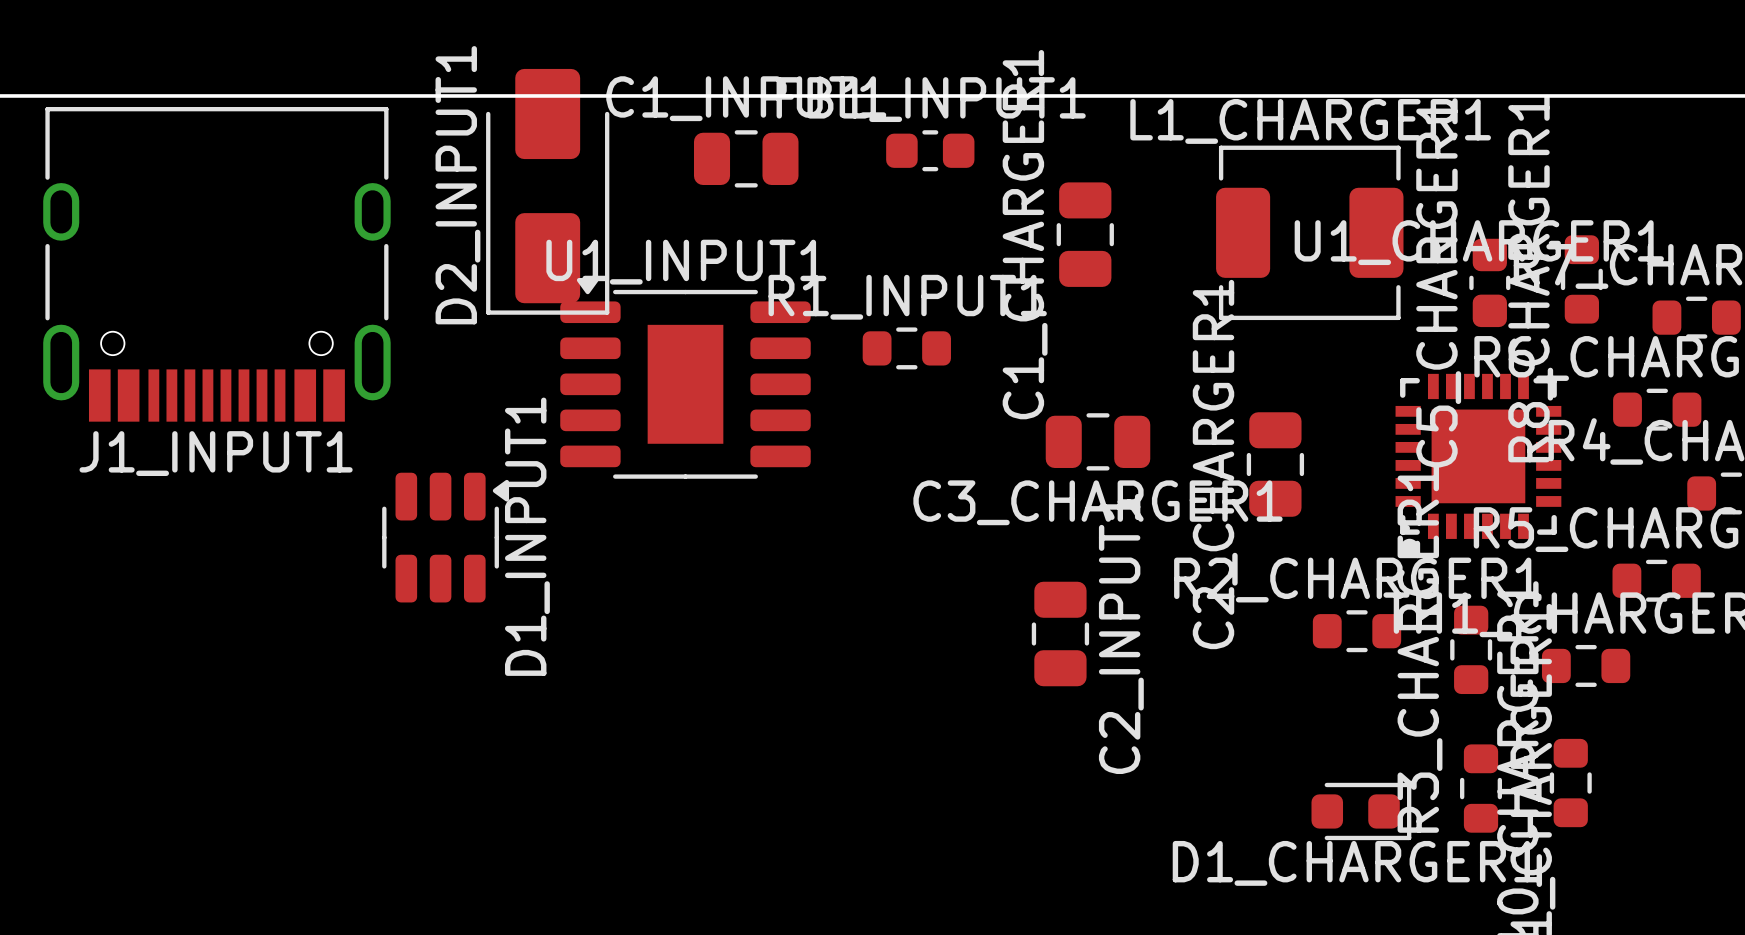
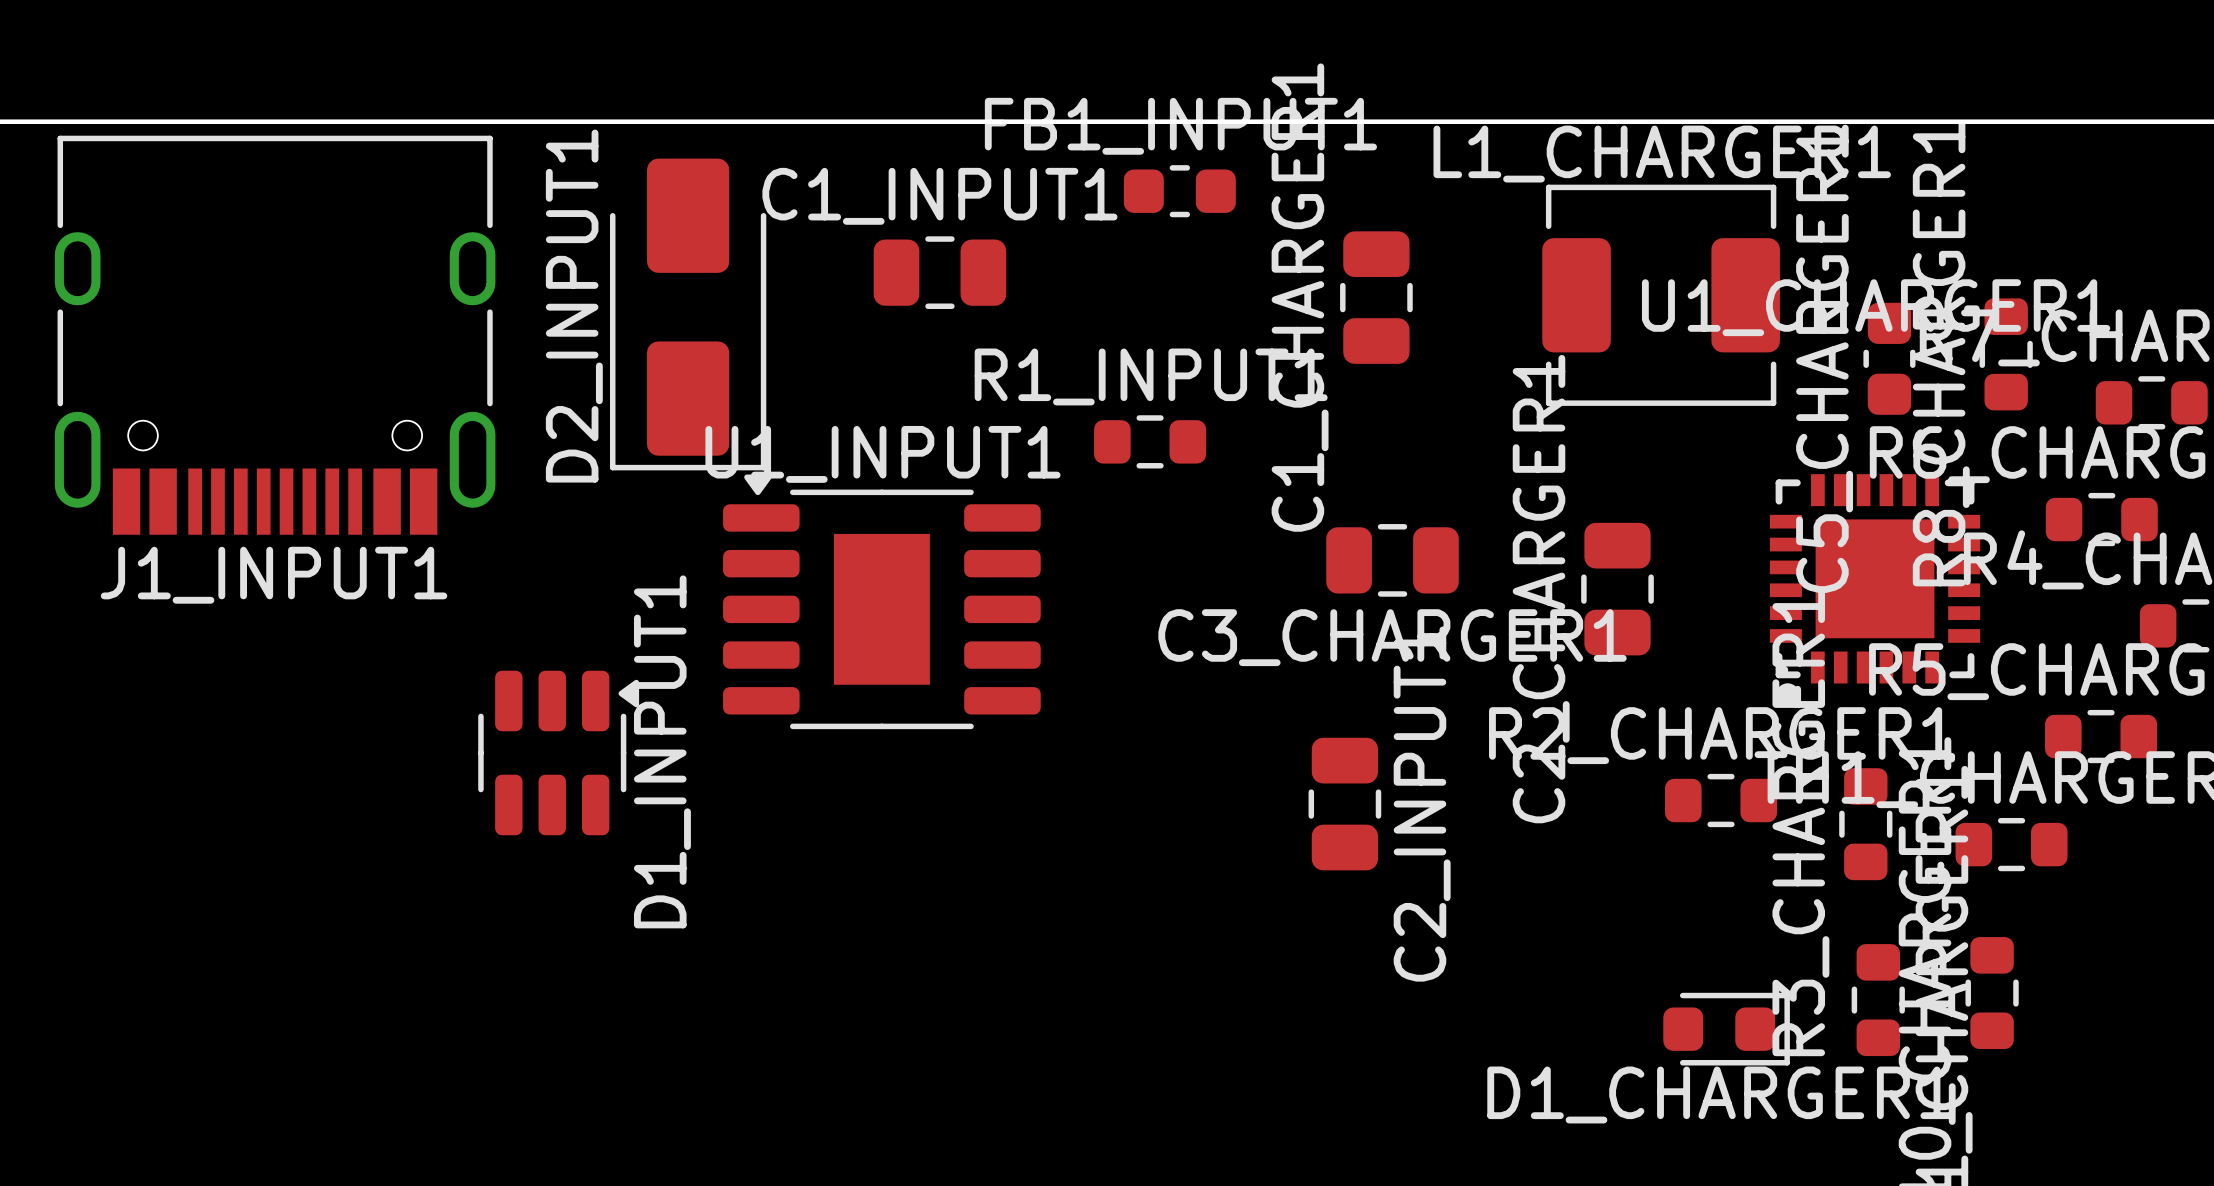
C1_INPUT1 position: (746, 158) -> (939, 272)
D2_INPUT1 position: (547, 191) -> (688, 314)
U1_INPUT1 position: (685, 378) -> (881, 601)
D1_INPUT1 position: (445, 537) -> (558, 752)

